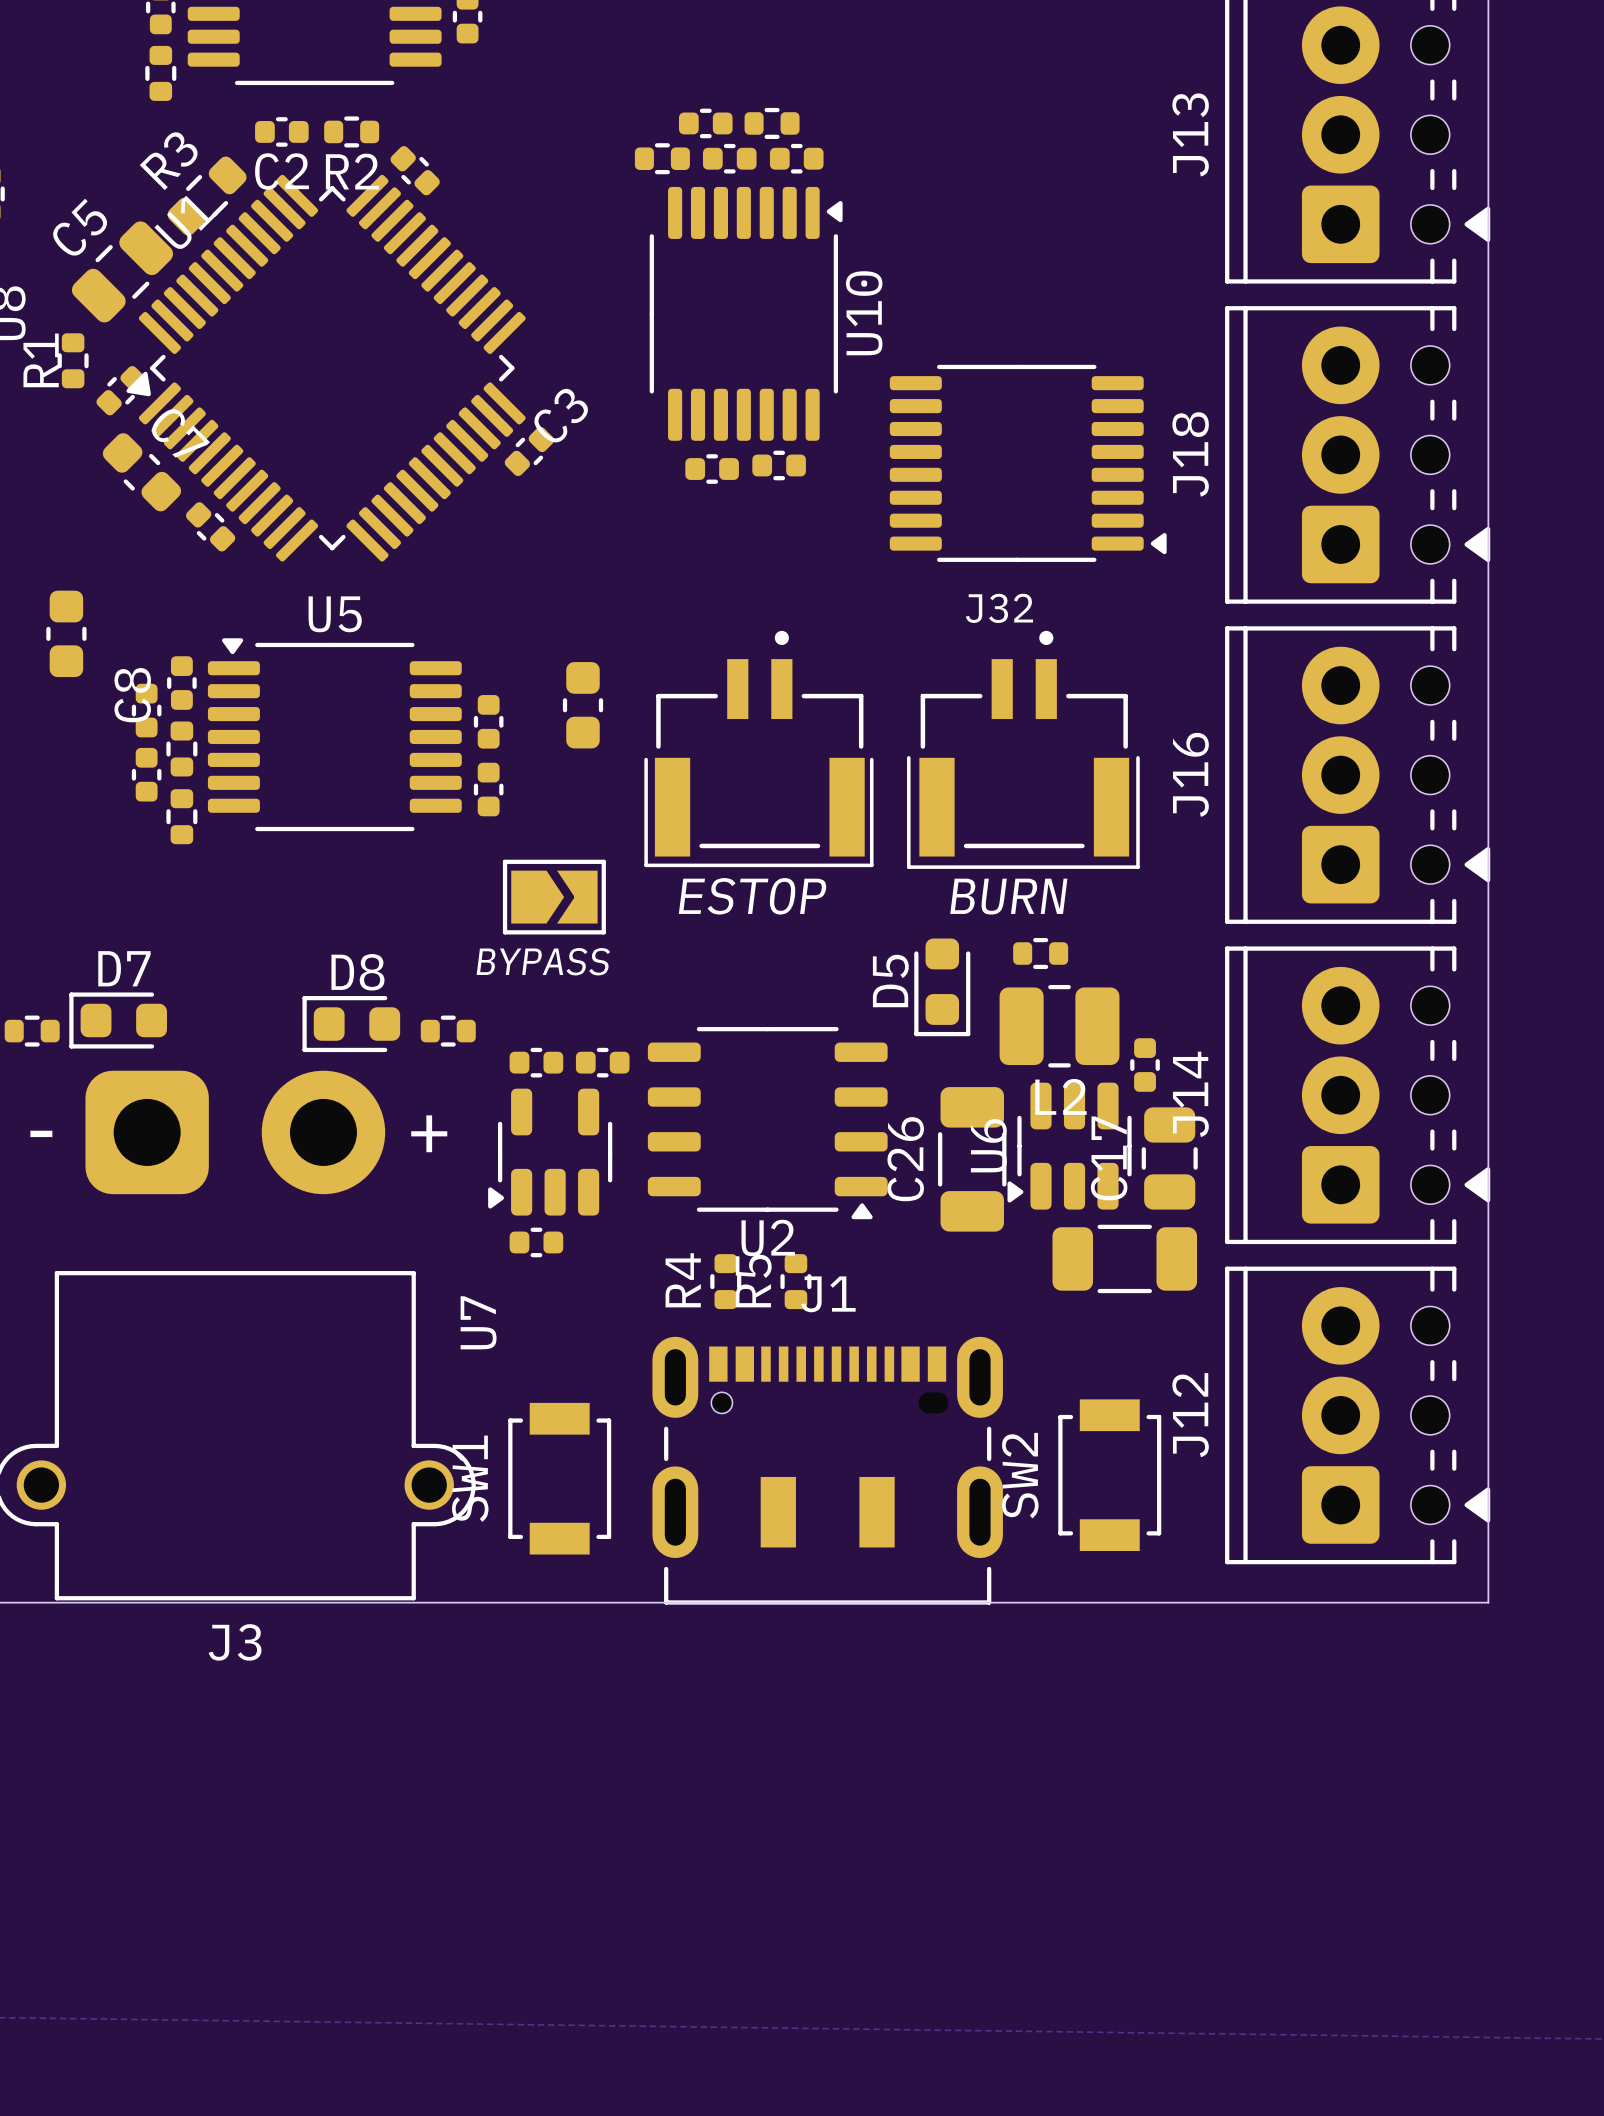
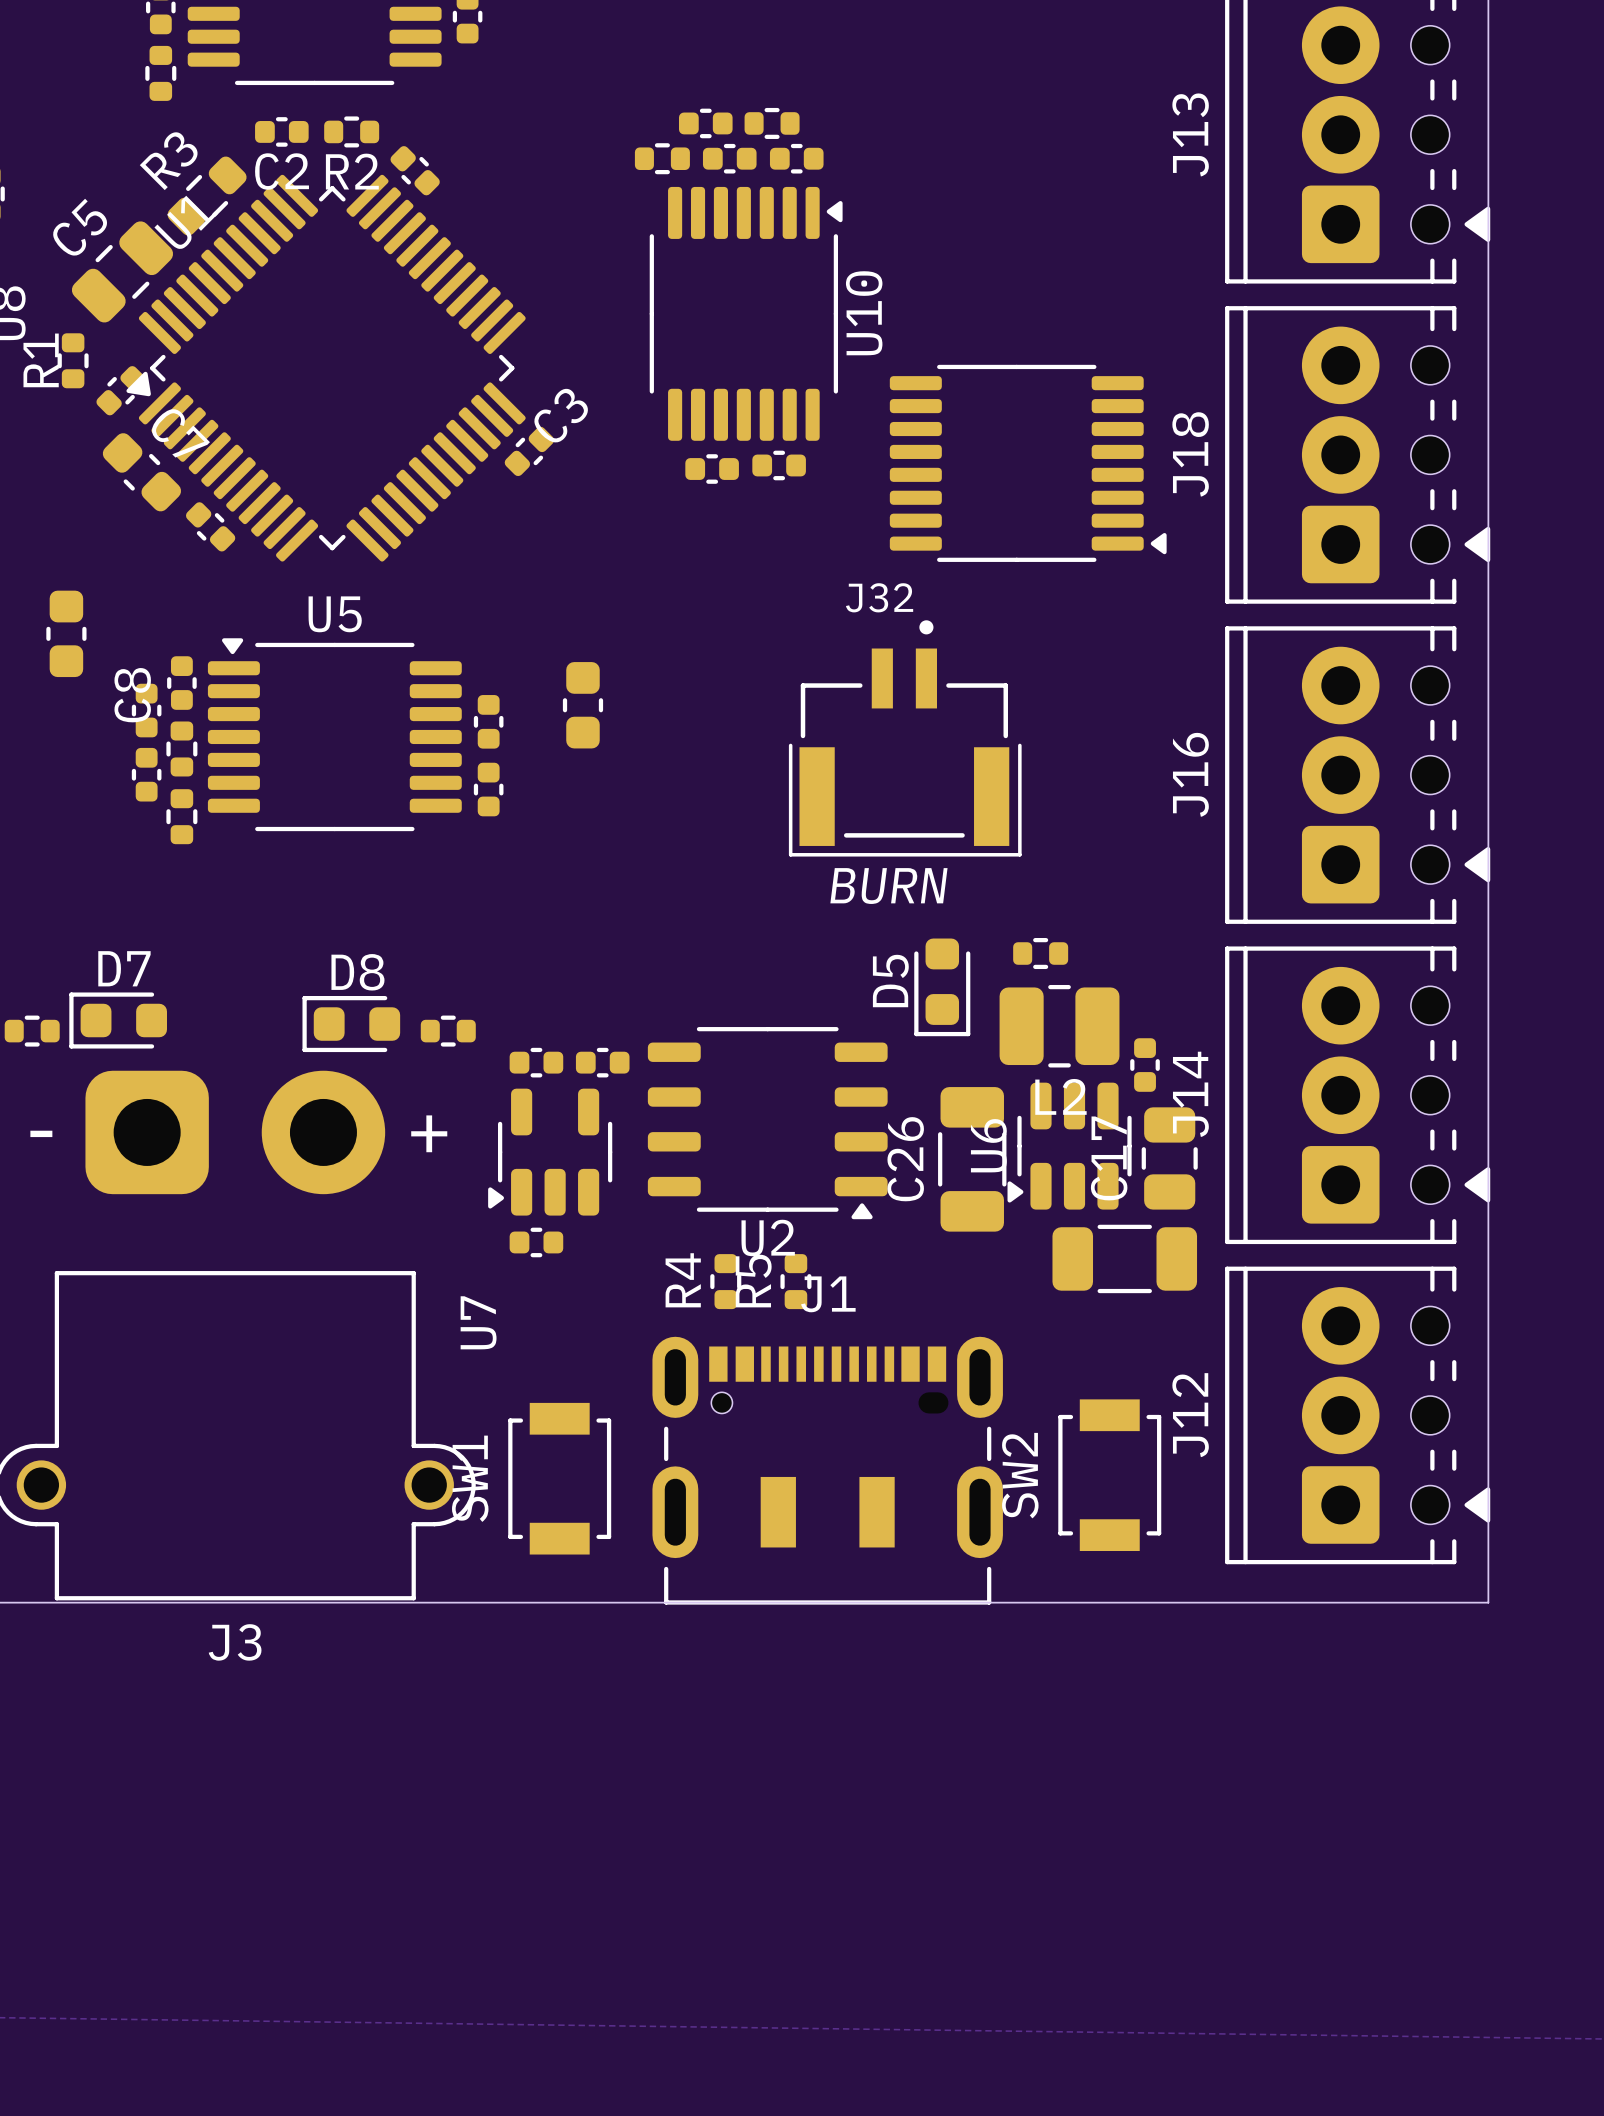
part: (759, 743) -> none
J32 position: (1024, 743) -> (904, 733)
line: (908, 757) (908, 867) (1137, 867) (1137, 757) -> (790, 745) (790, 854) (1019, 854) (1019, 745)
line: (646, 759) (646, 865) (871, 865) (871, 759) -> none
text: ESTOP (752, 896) -> none
text position: BURN (1008, 896) -> BURN (888, 886)
part: (554, 897) -> none
text: BYPASS (543, 961) -> none

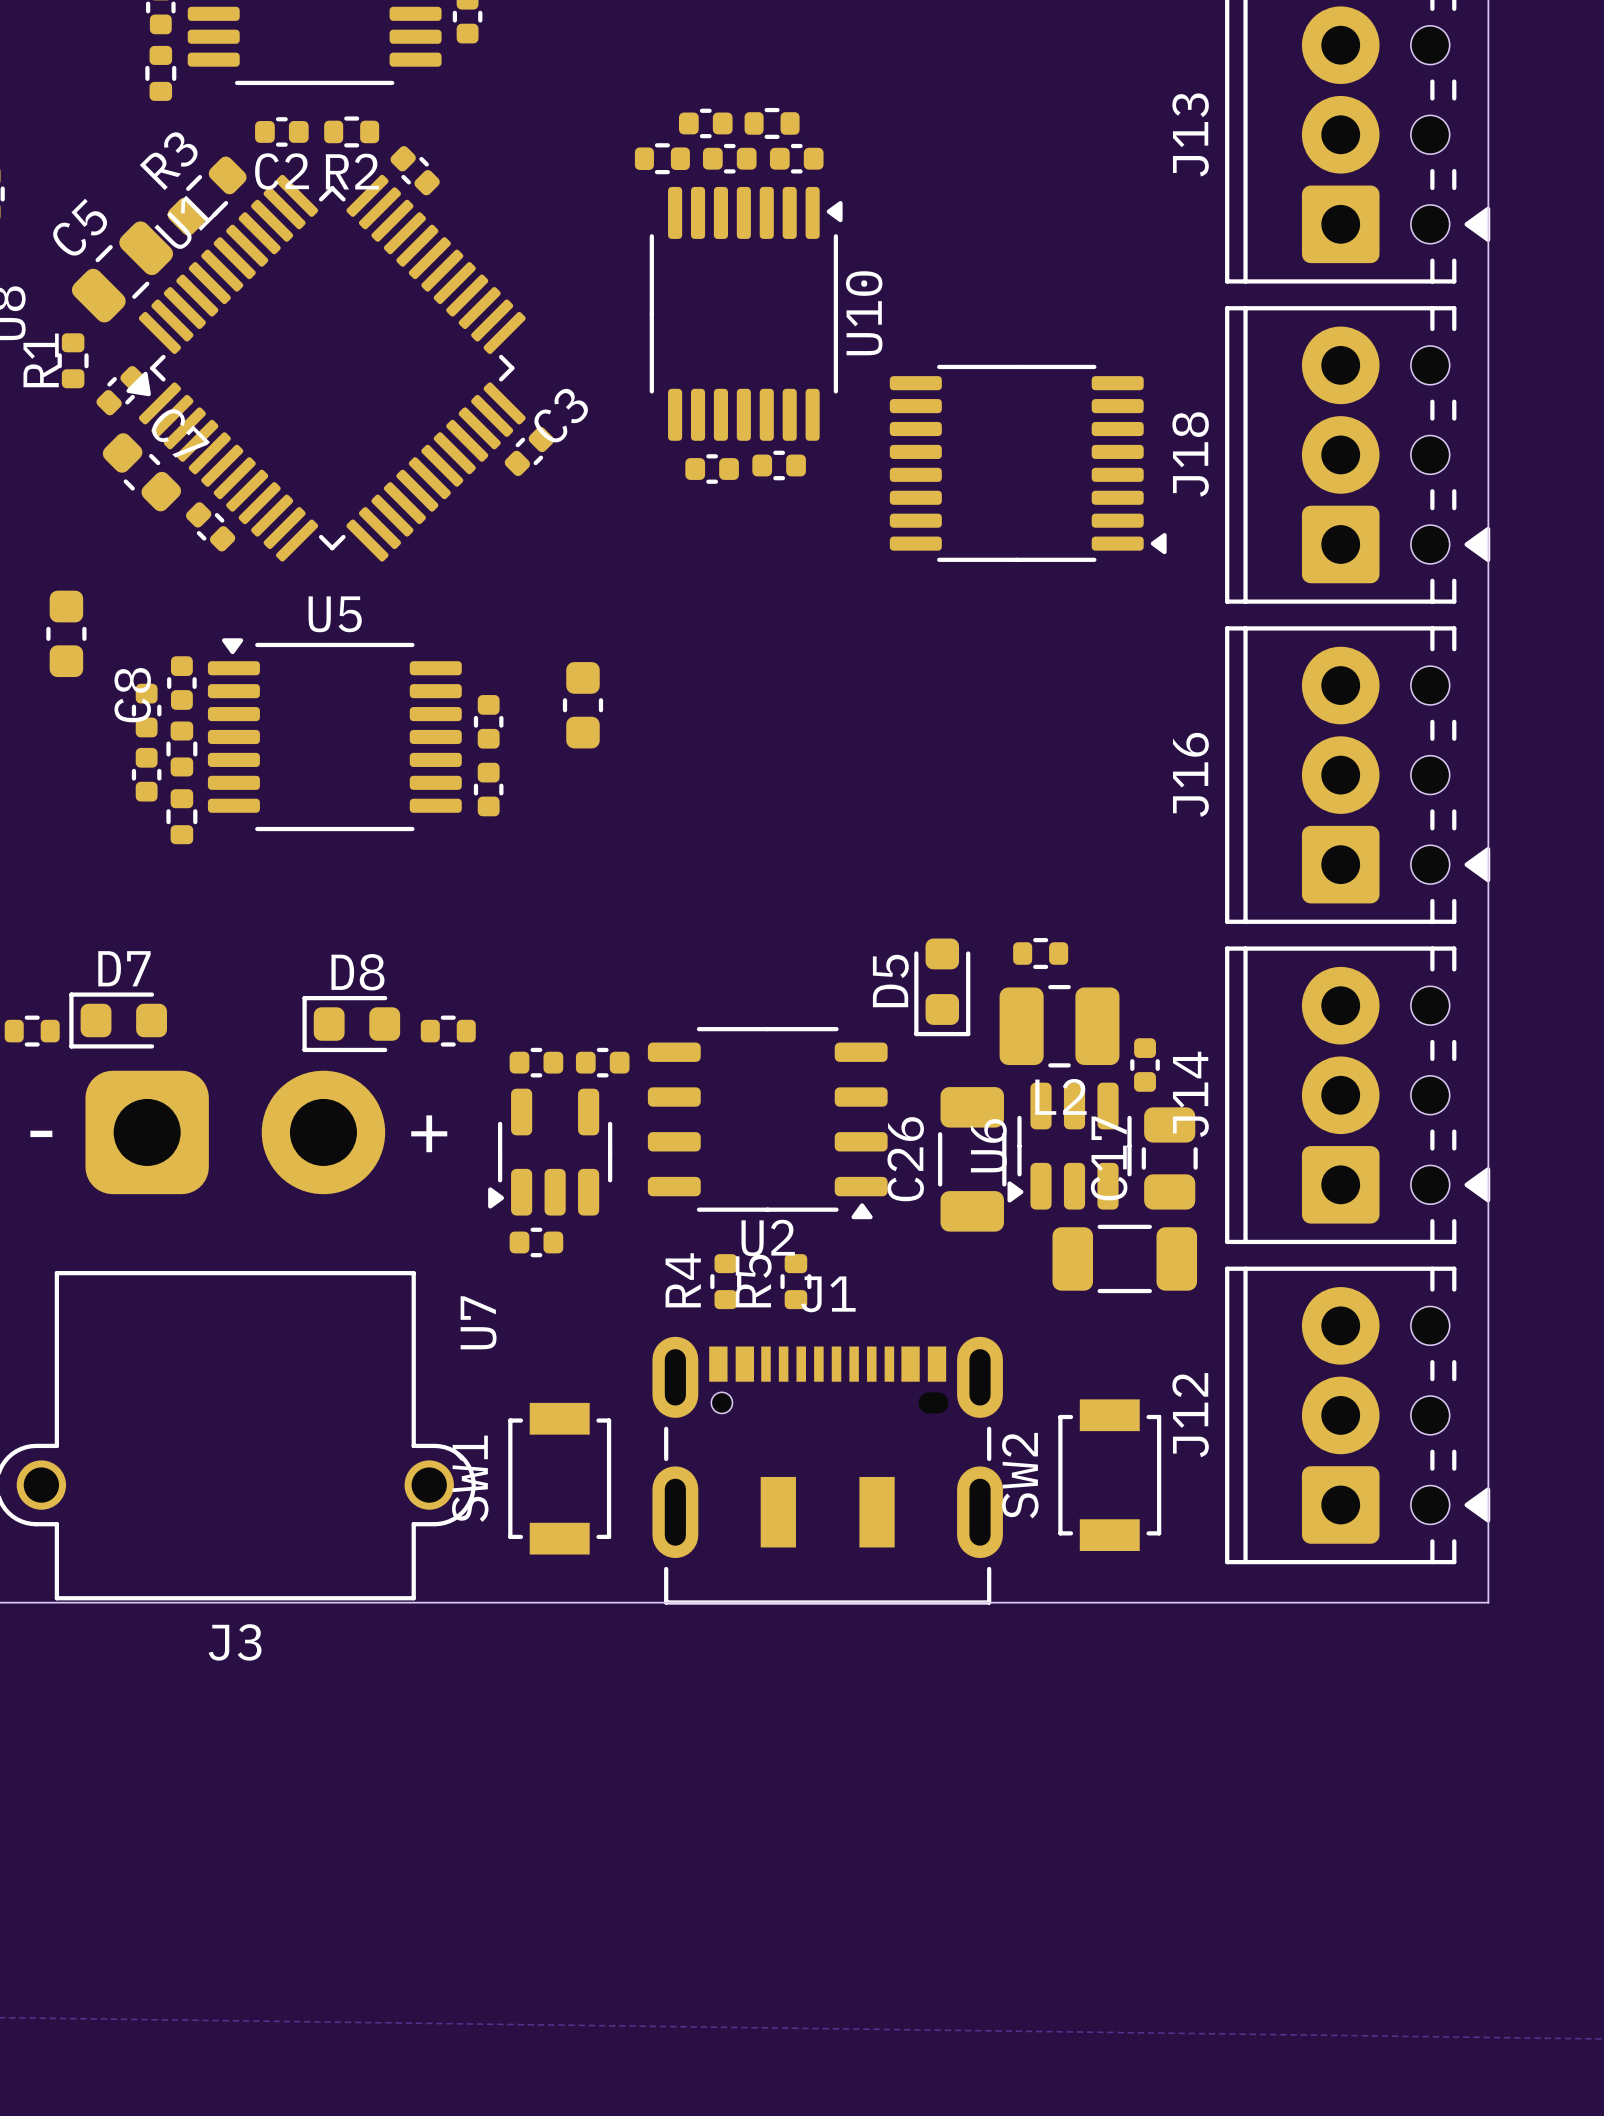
J32: (904, 733) -> none
line: (790, 745) (790, 854) (1019, 854) (1019, 745) -> none
text: BURN (888, 886) -> none

